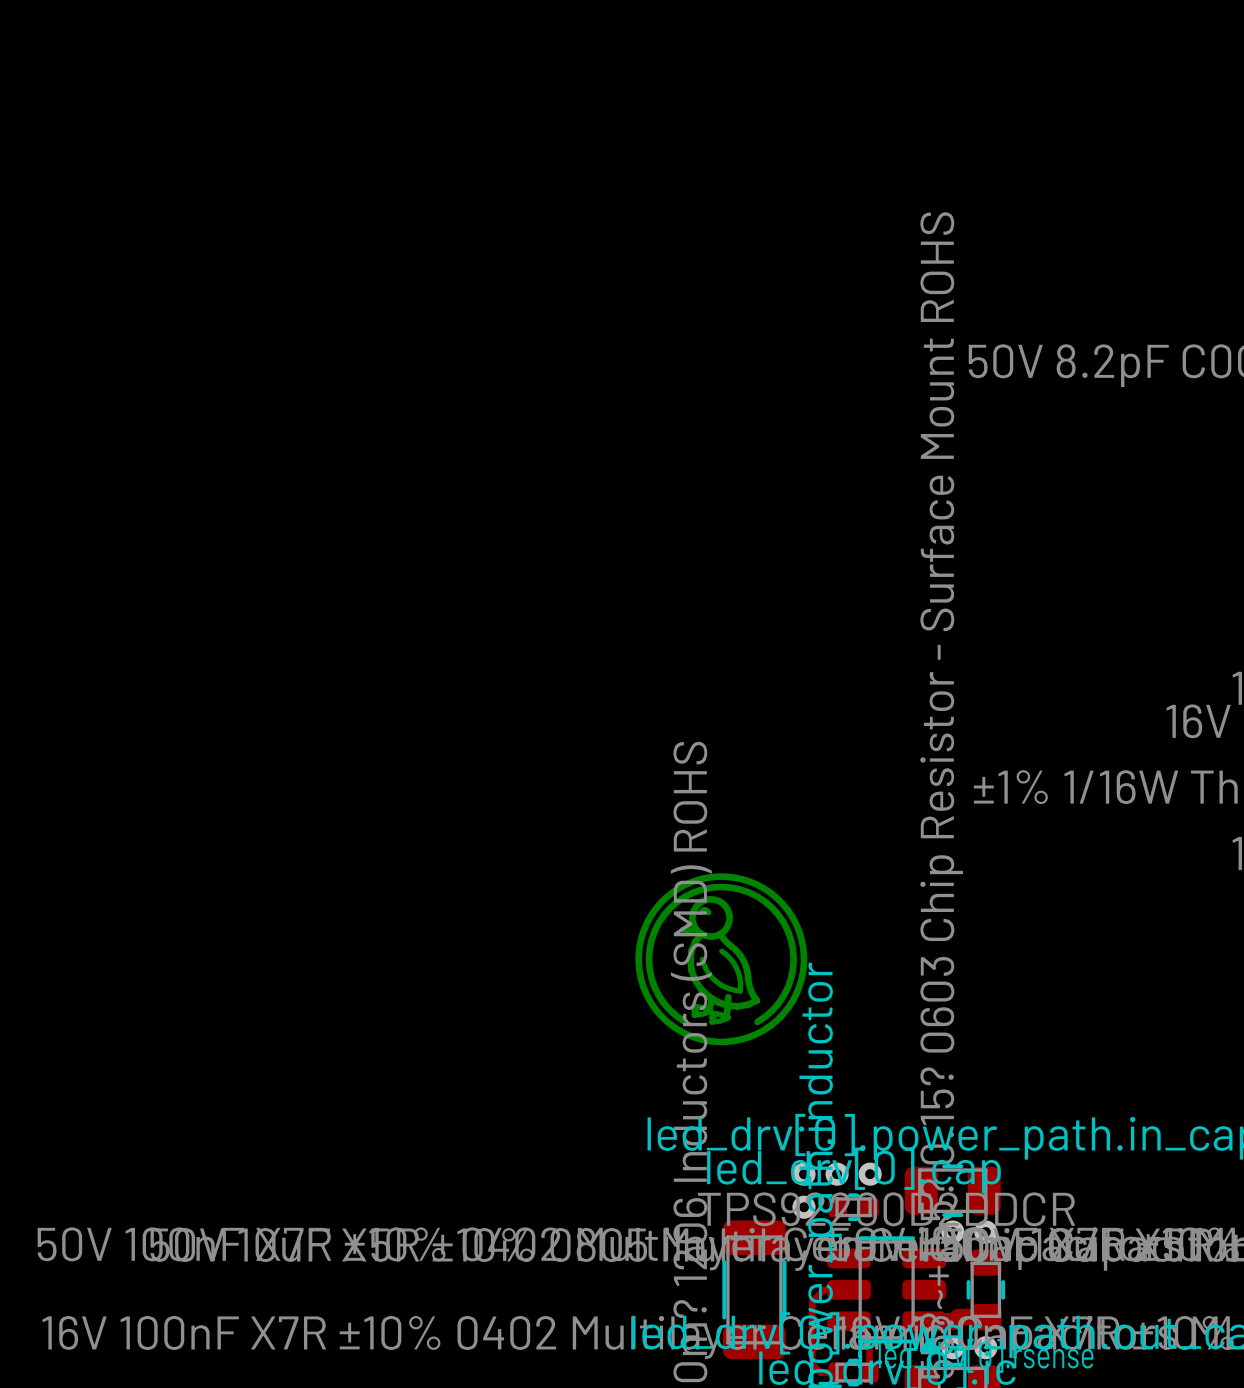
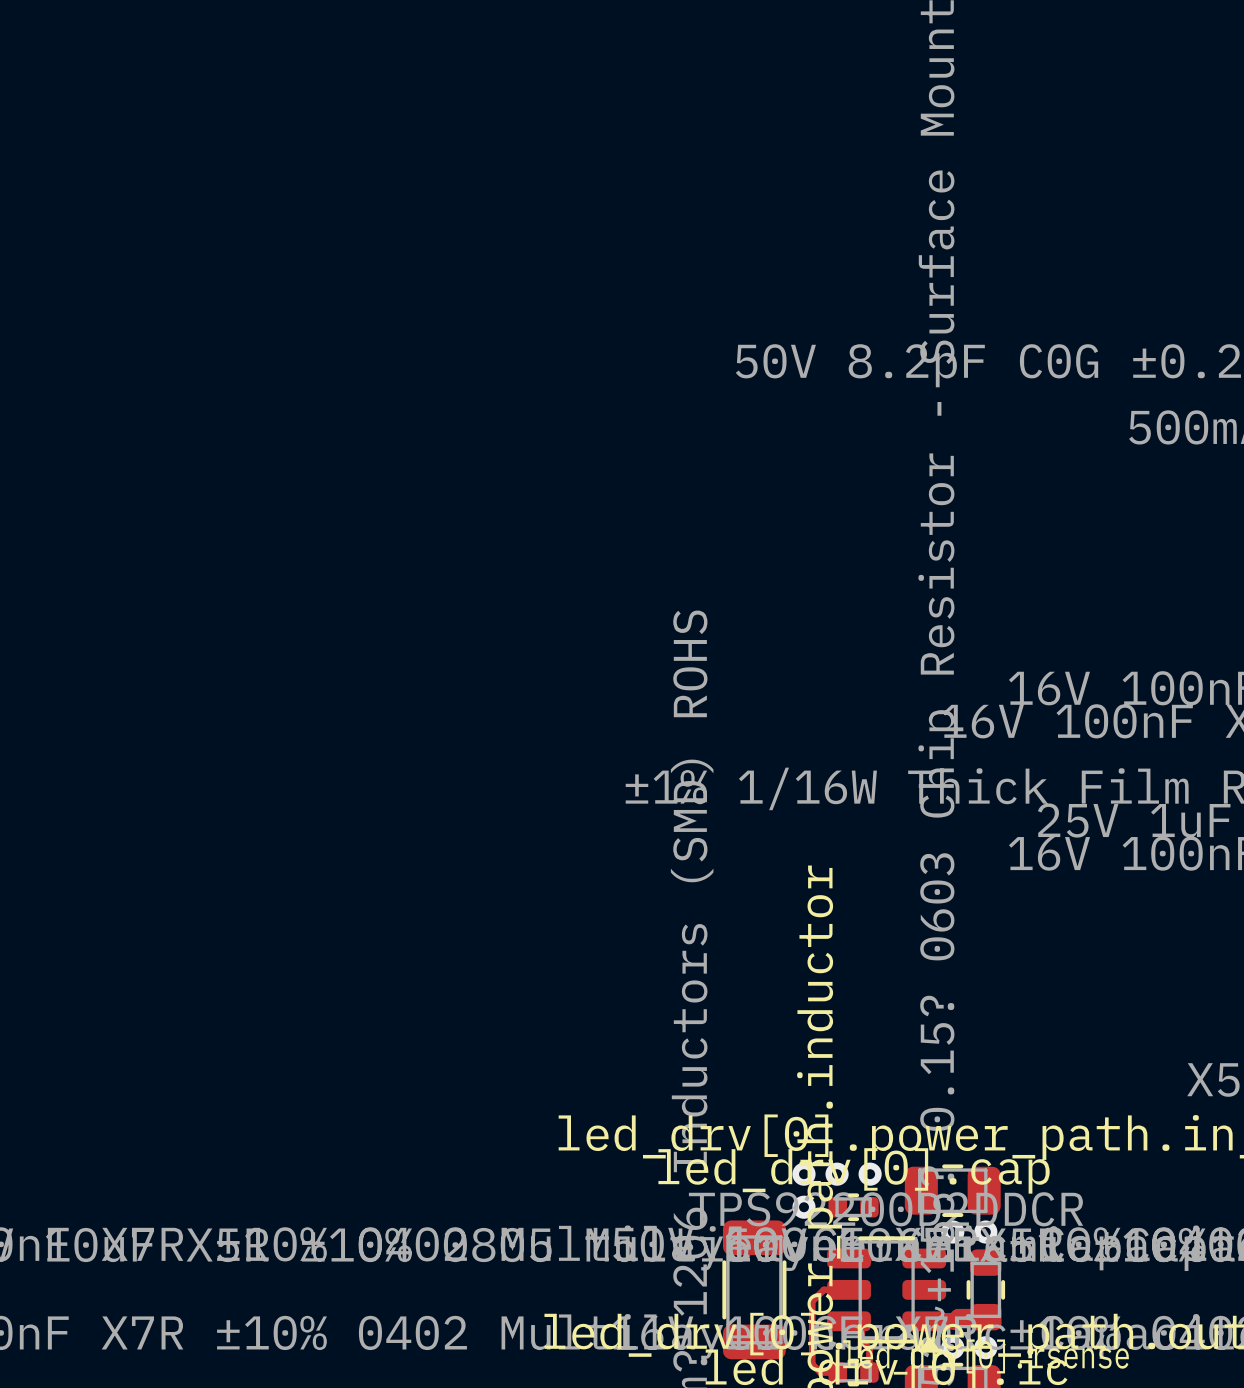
drawing: [635, 873, 808, 1046] -> none

